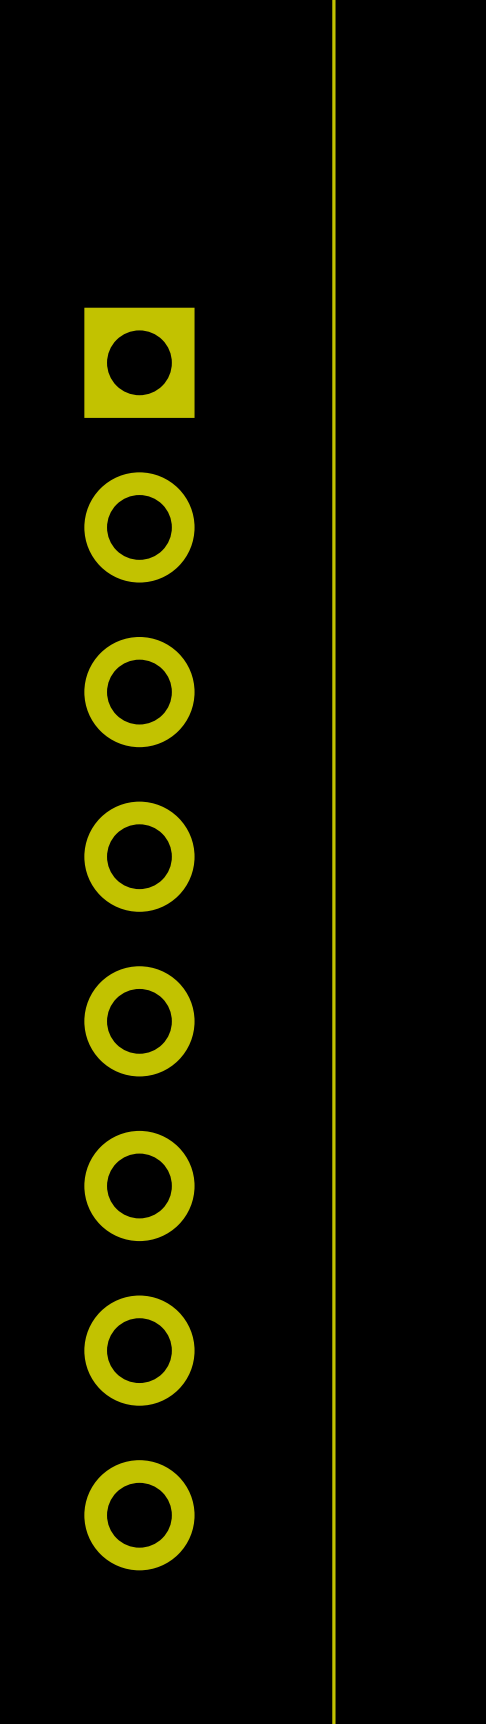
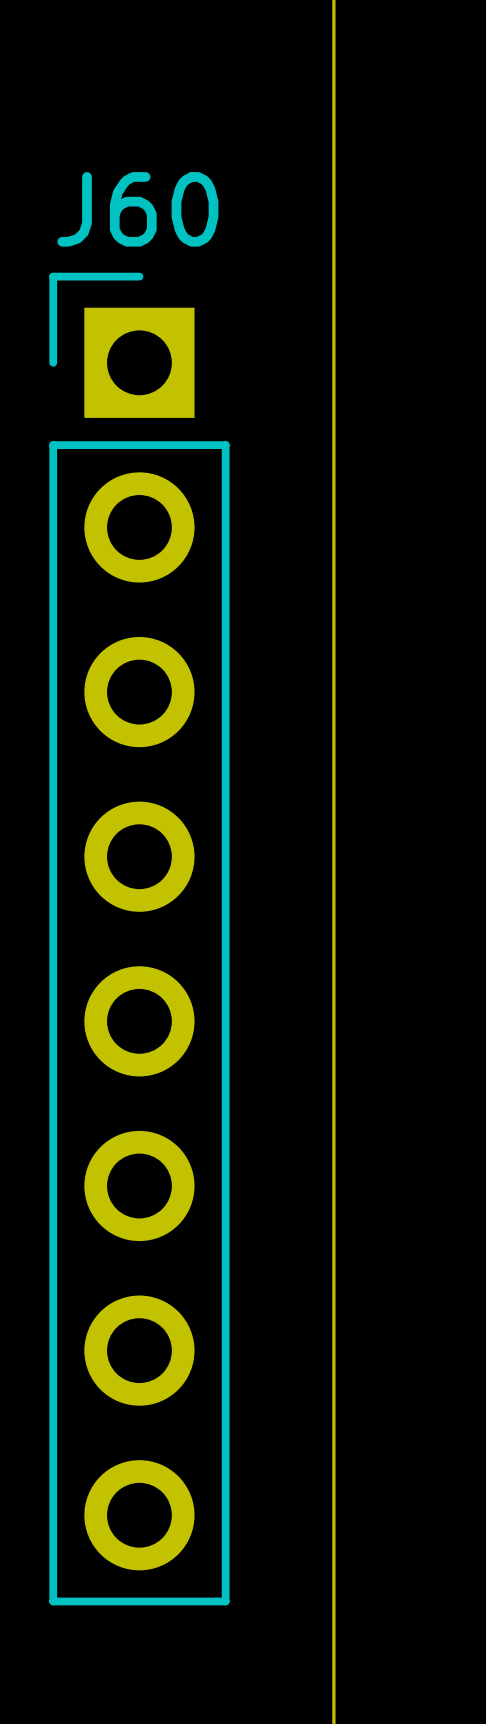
J60 side: top (139, 939) -> bottom (139, 939)

